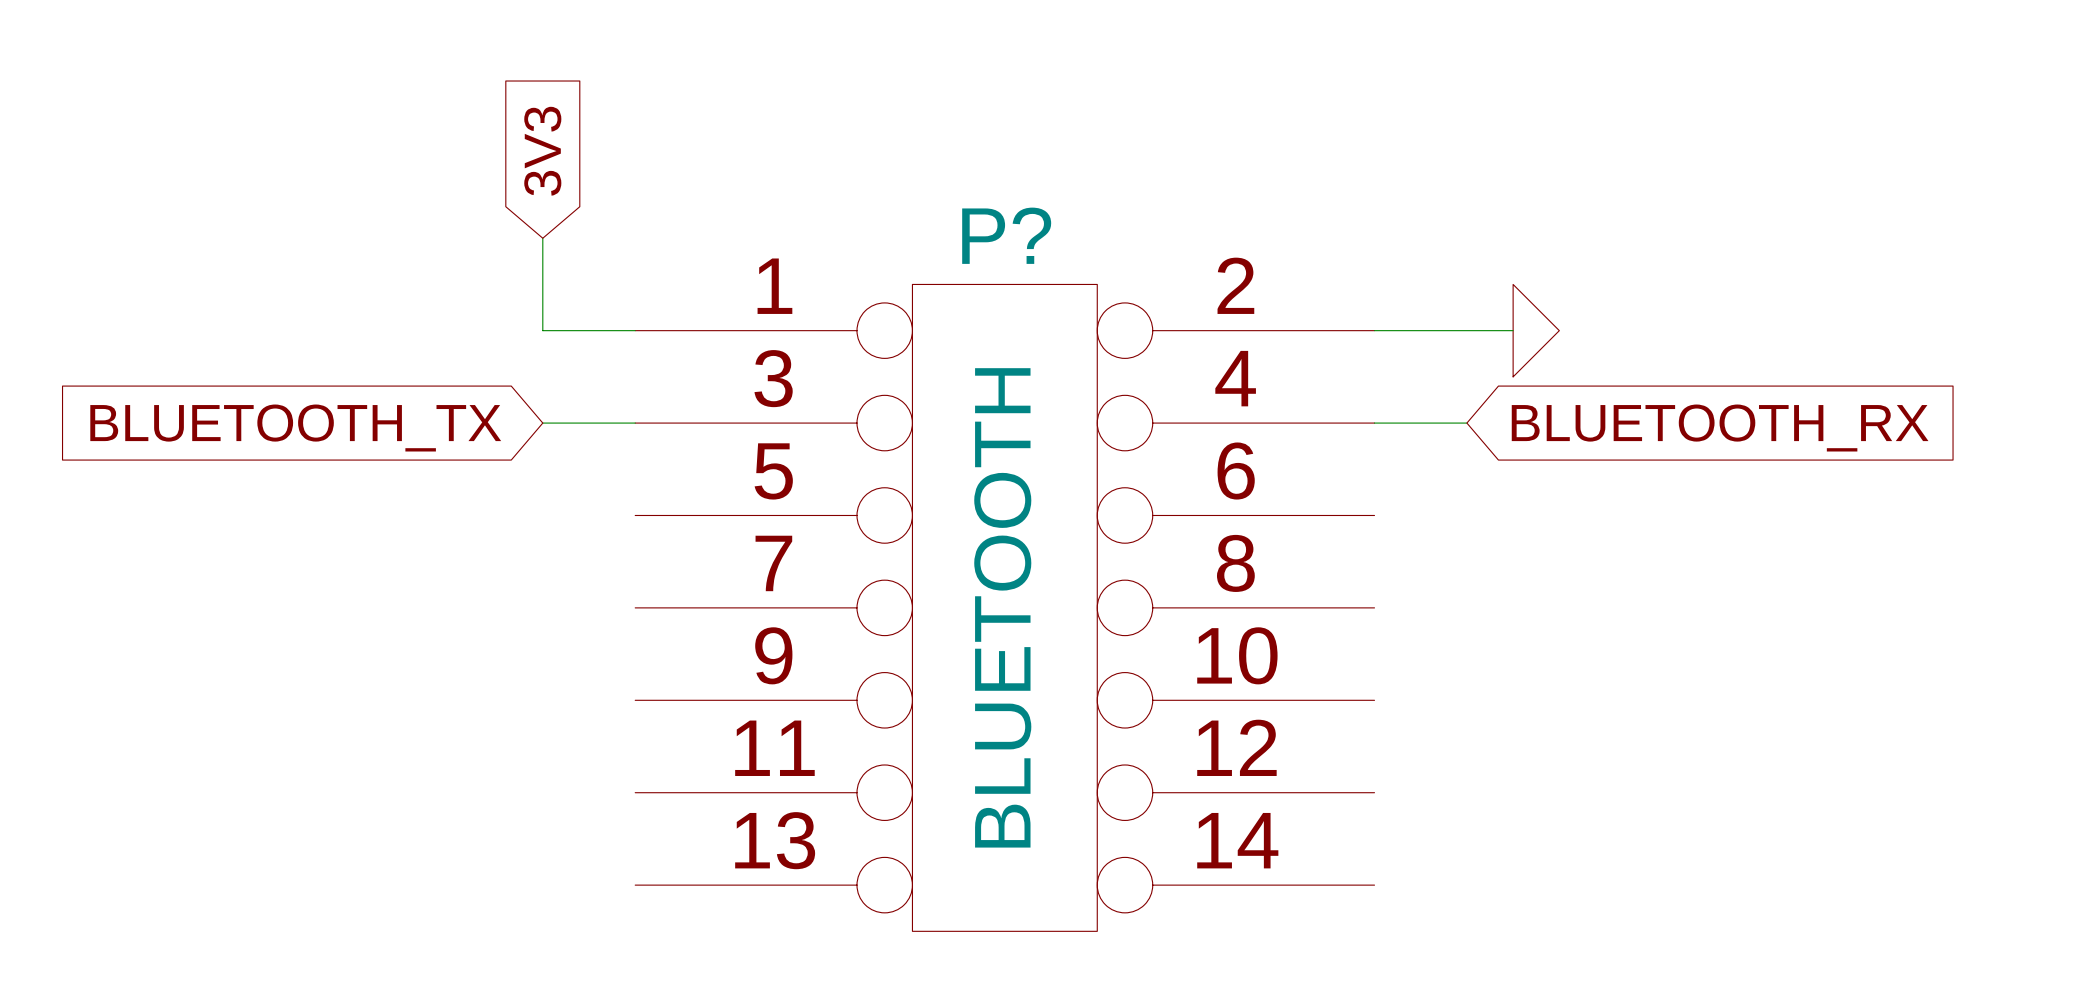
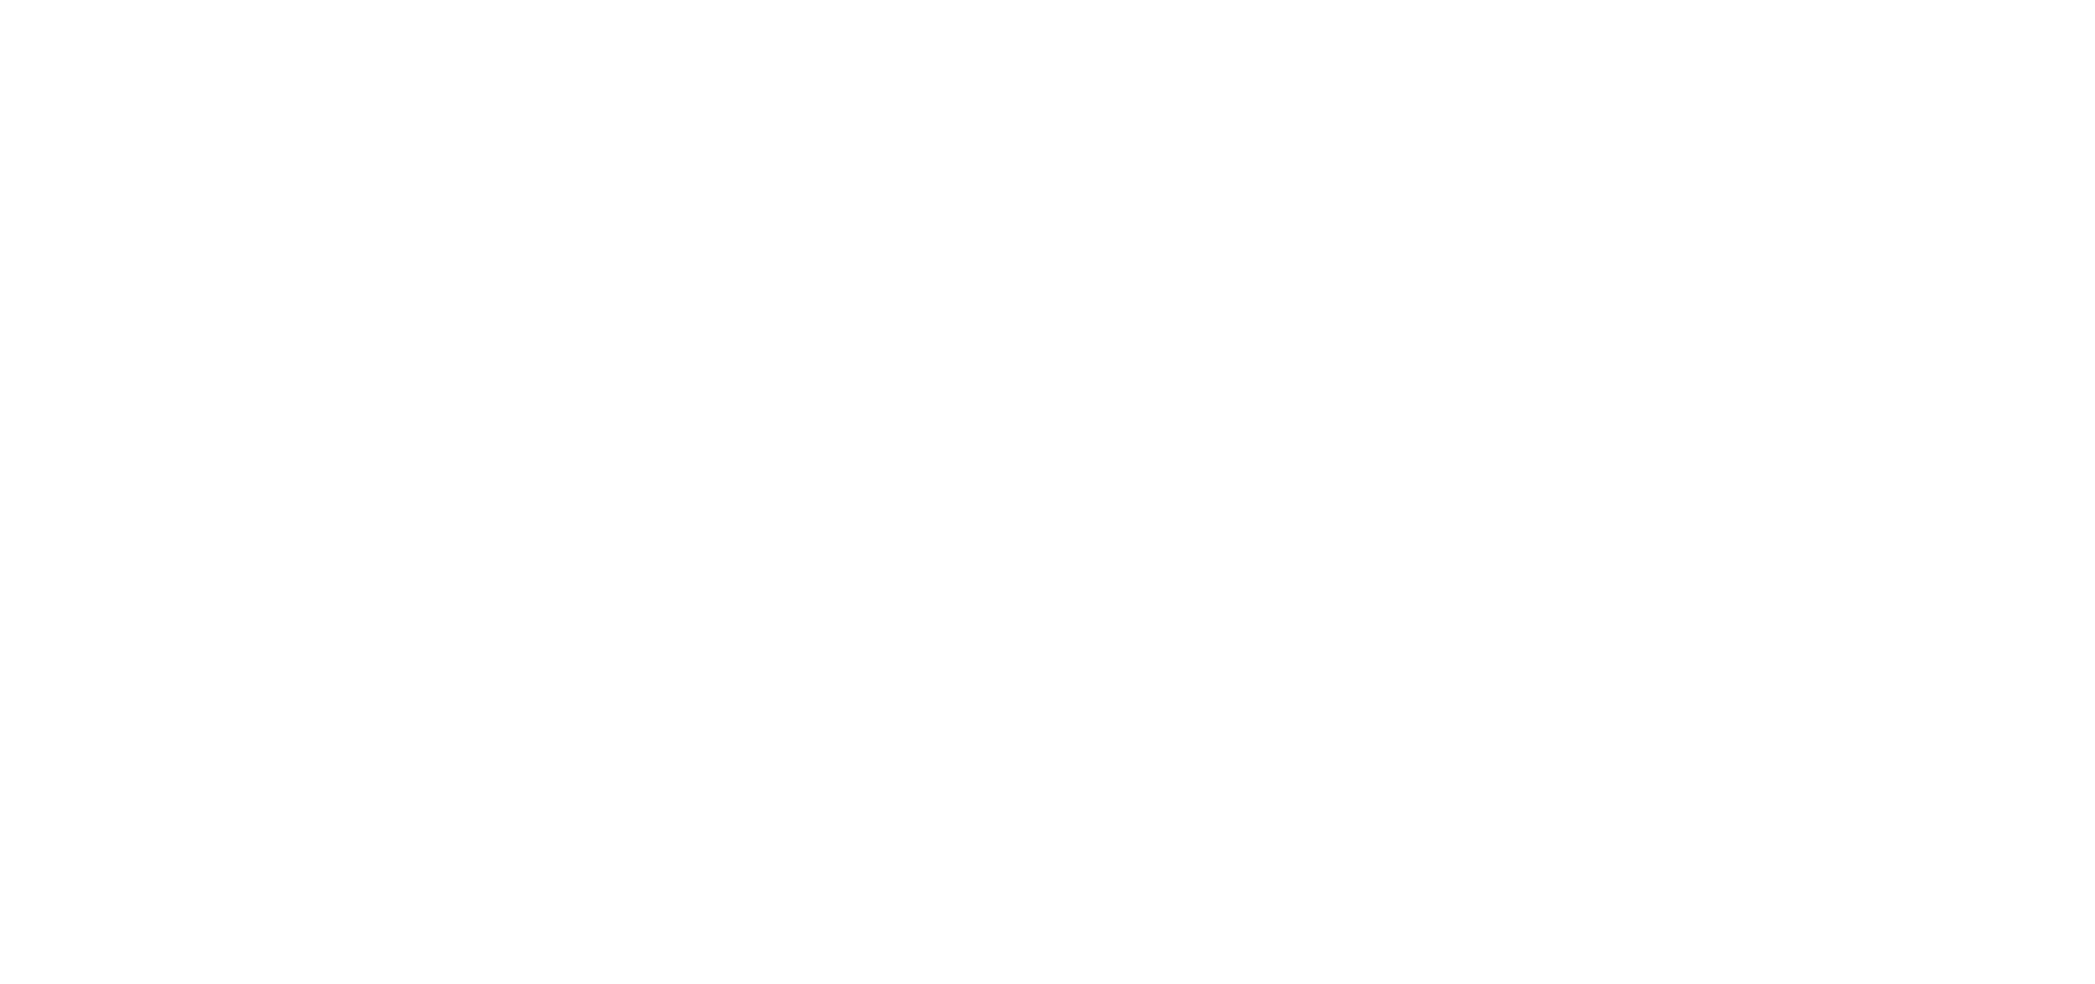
global label: 3V3 (542, 151) -> none
wire: (542, 238) (542, 330) (635, 330) -> none
wire: (1374, 330) (1513, 330) -> none
power symbol: (1536, 330) -> none
wire: (542, 423) (635, 423) -> none
wire: (1374, 423) (1466, 423) -> none
global label: BLUETOOTH_TX (295, 428) -> none
global label: BLUETOOTH_RX (1720, 428) -> none
P?: BLUETOOTH (1004, 607) -> none

